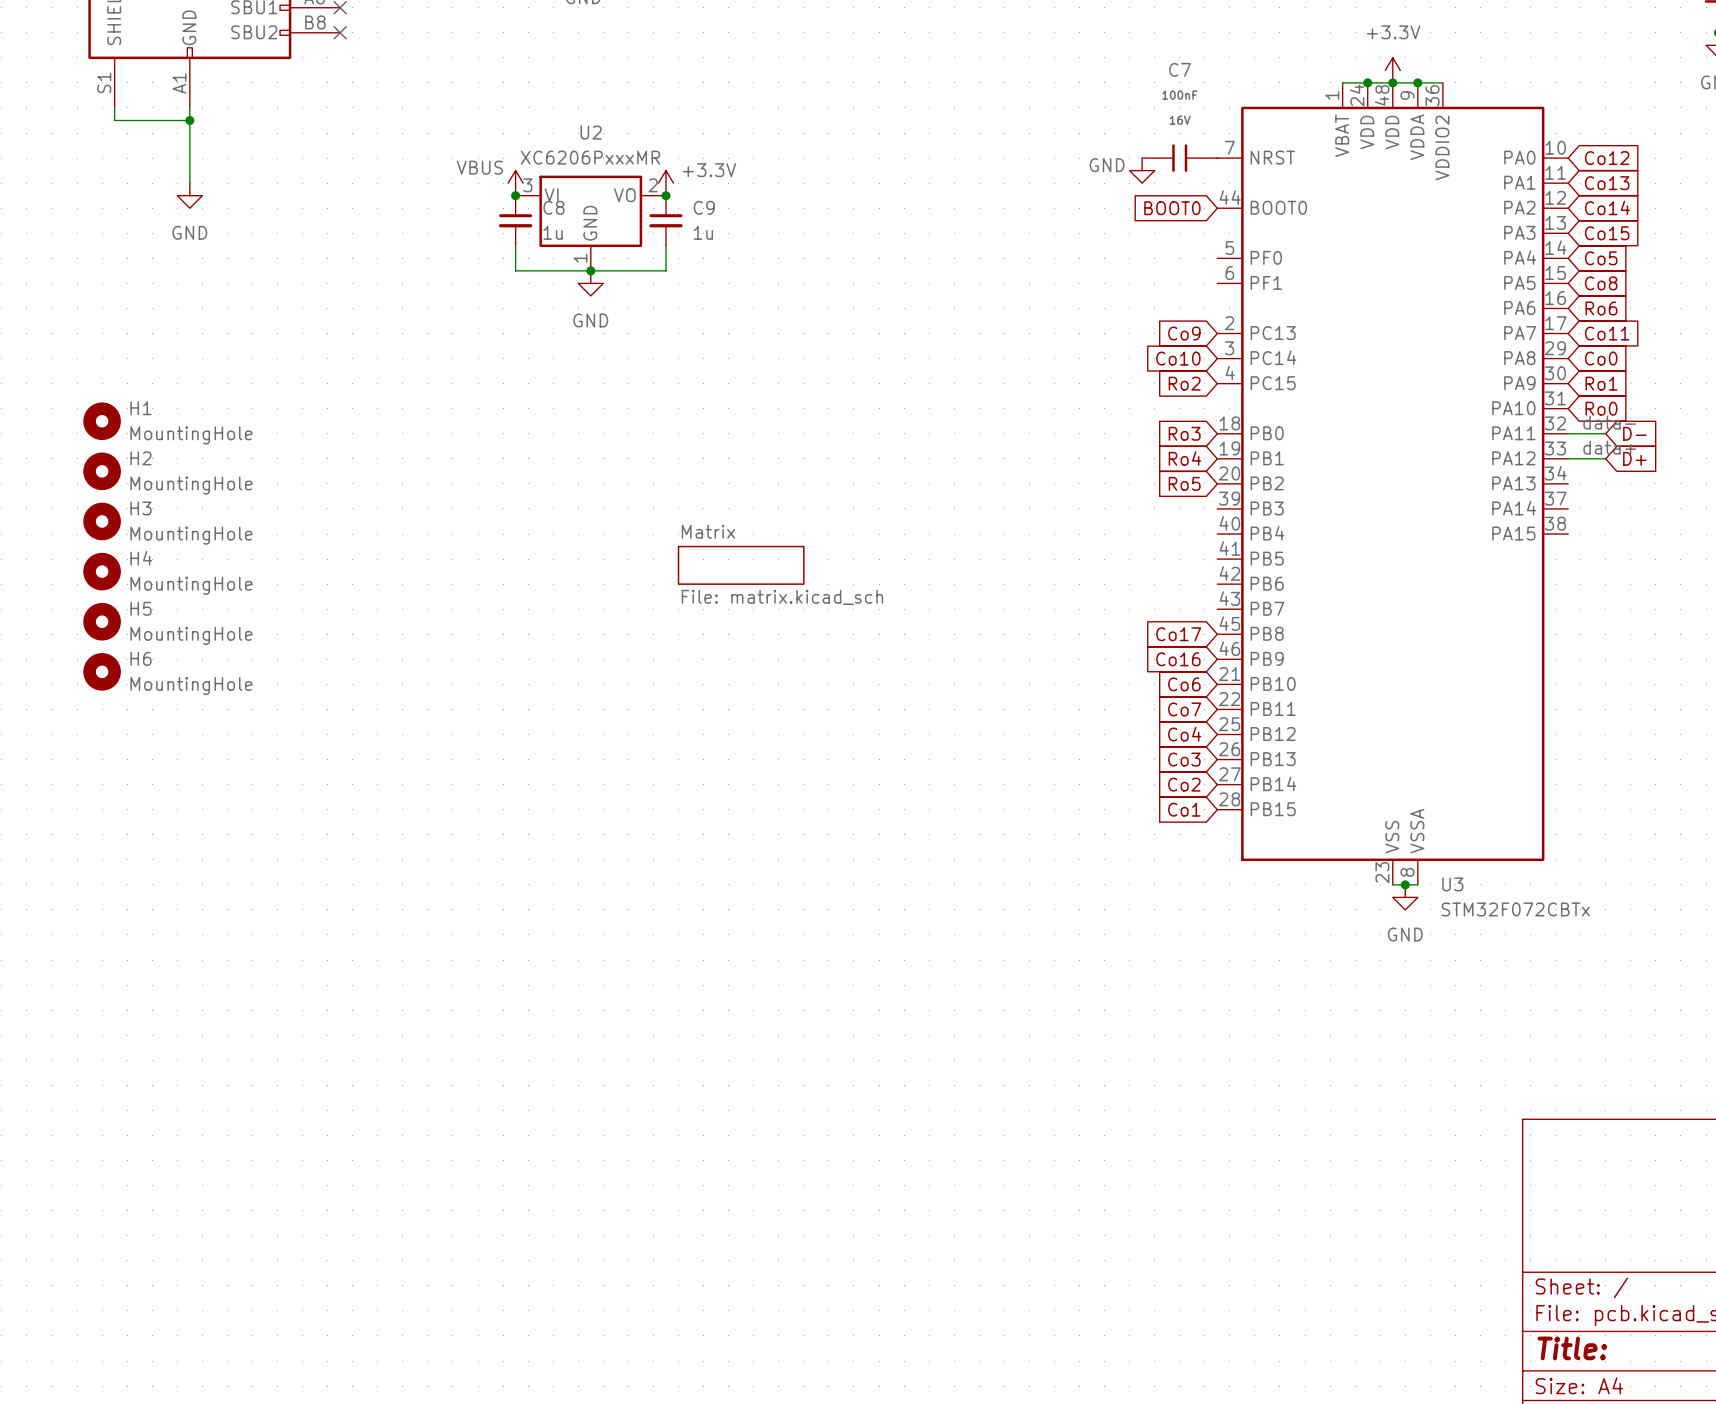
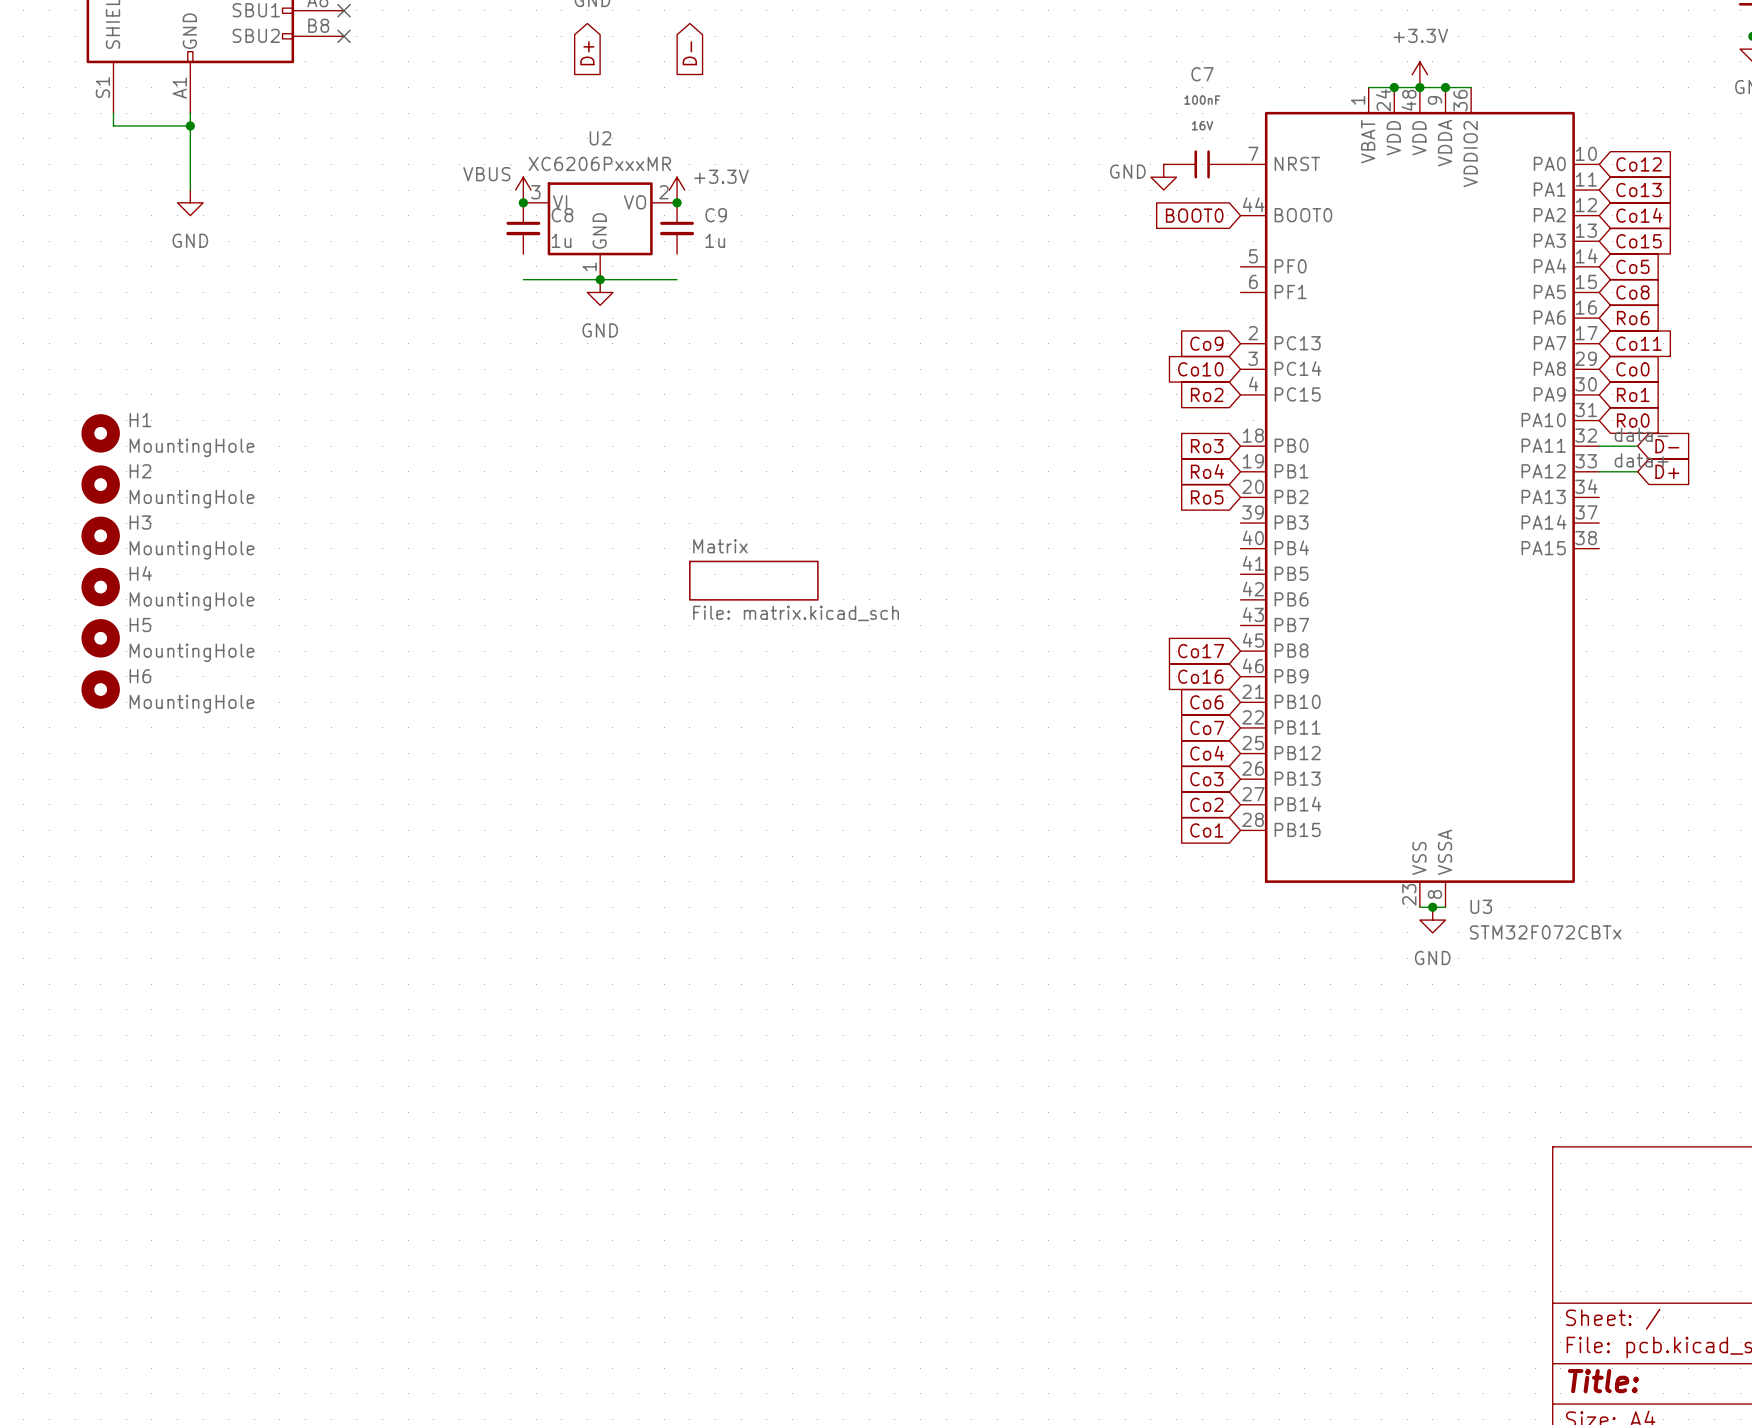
global label: none -> D+ (587, 53)
global label: none -> D- (689, 53)
wire: (515, 245) (515, 270) -> none
wire: (665, 245) (665, 270) -> none

